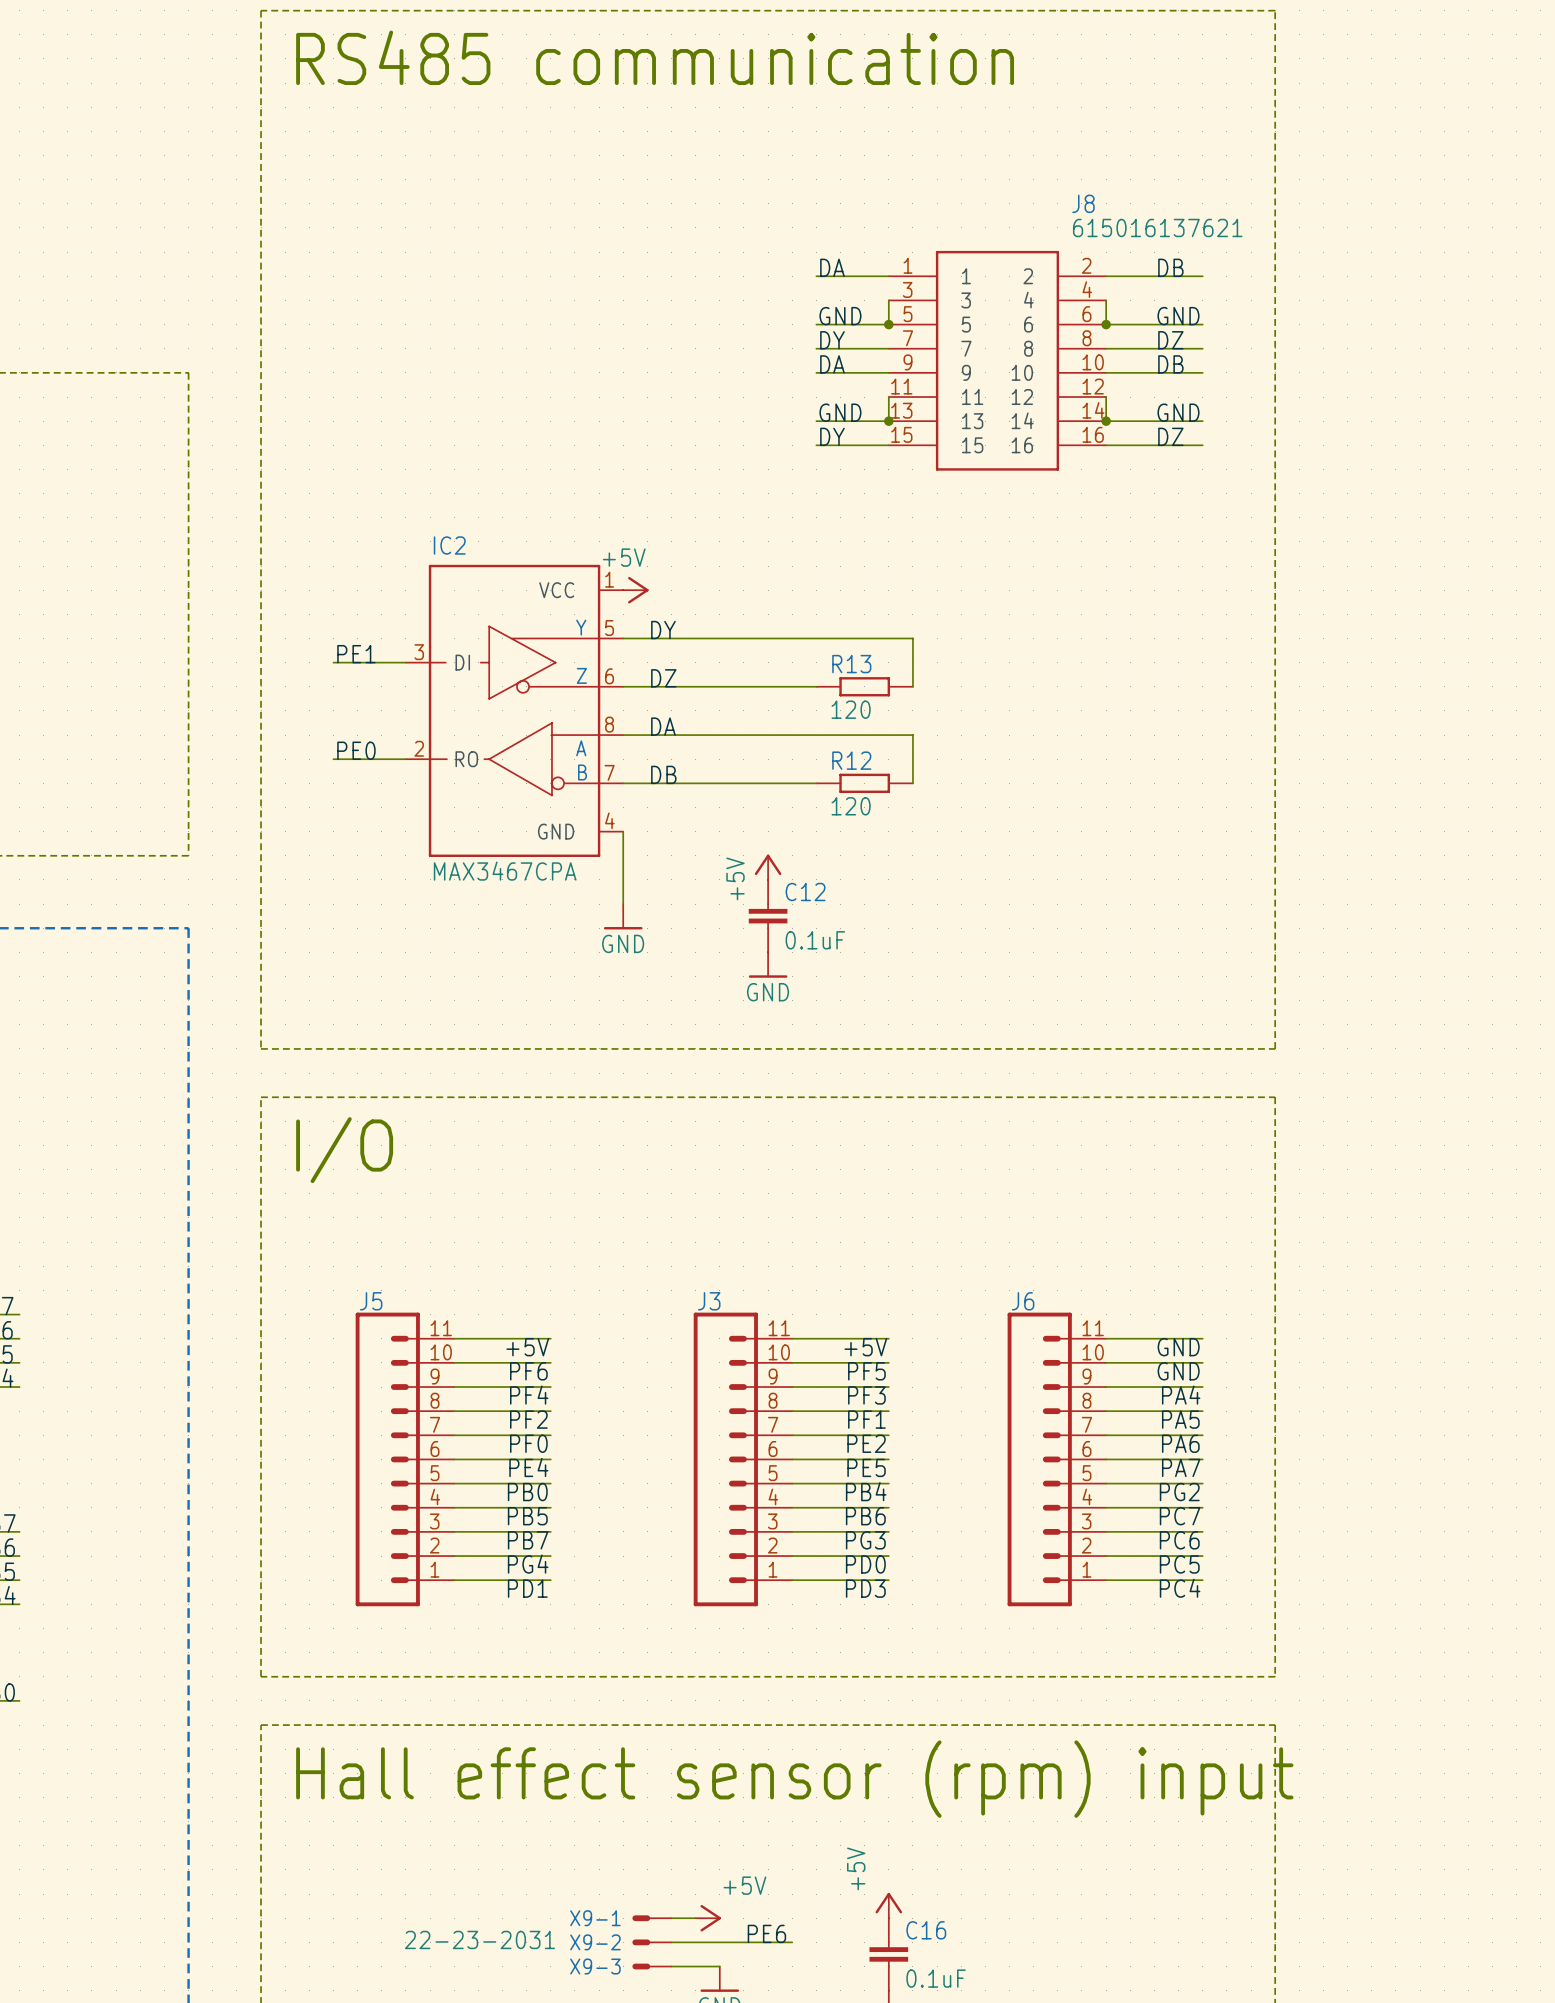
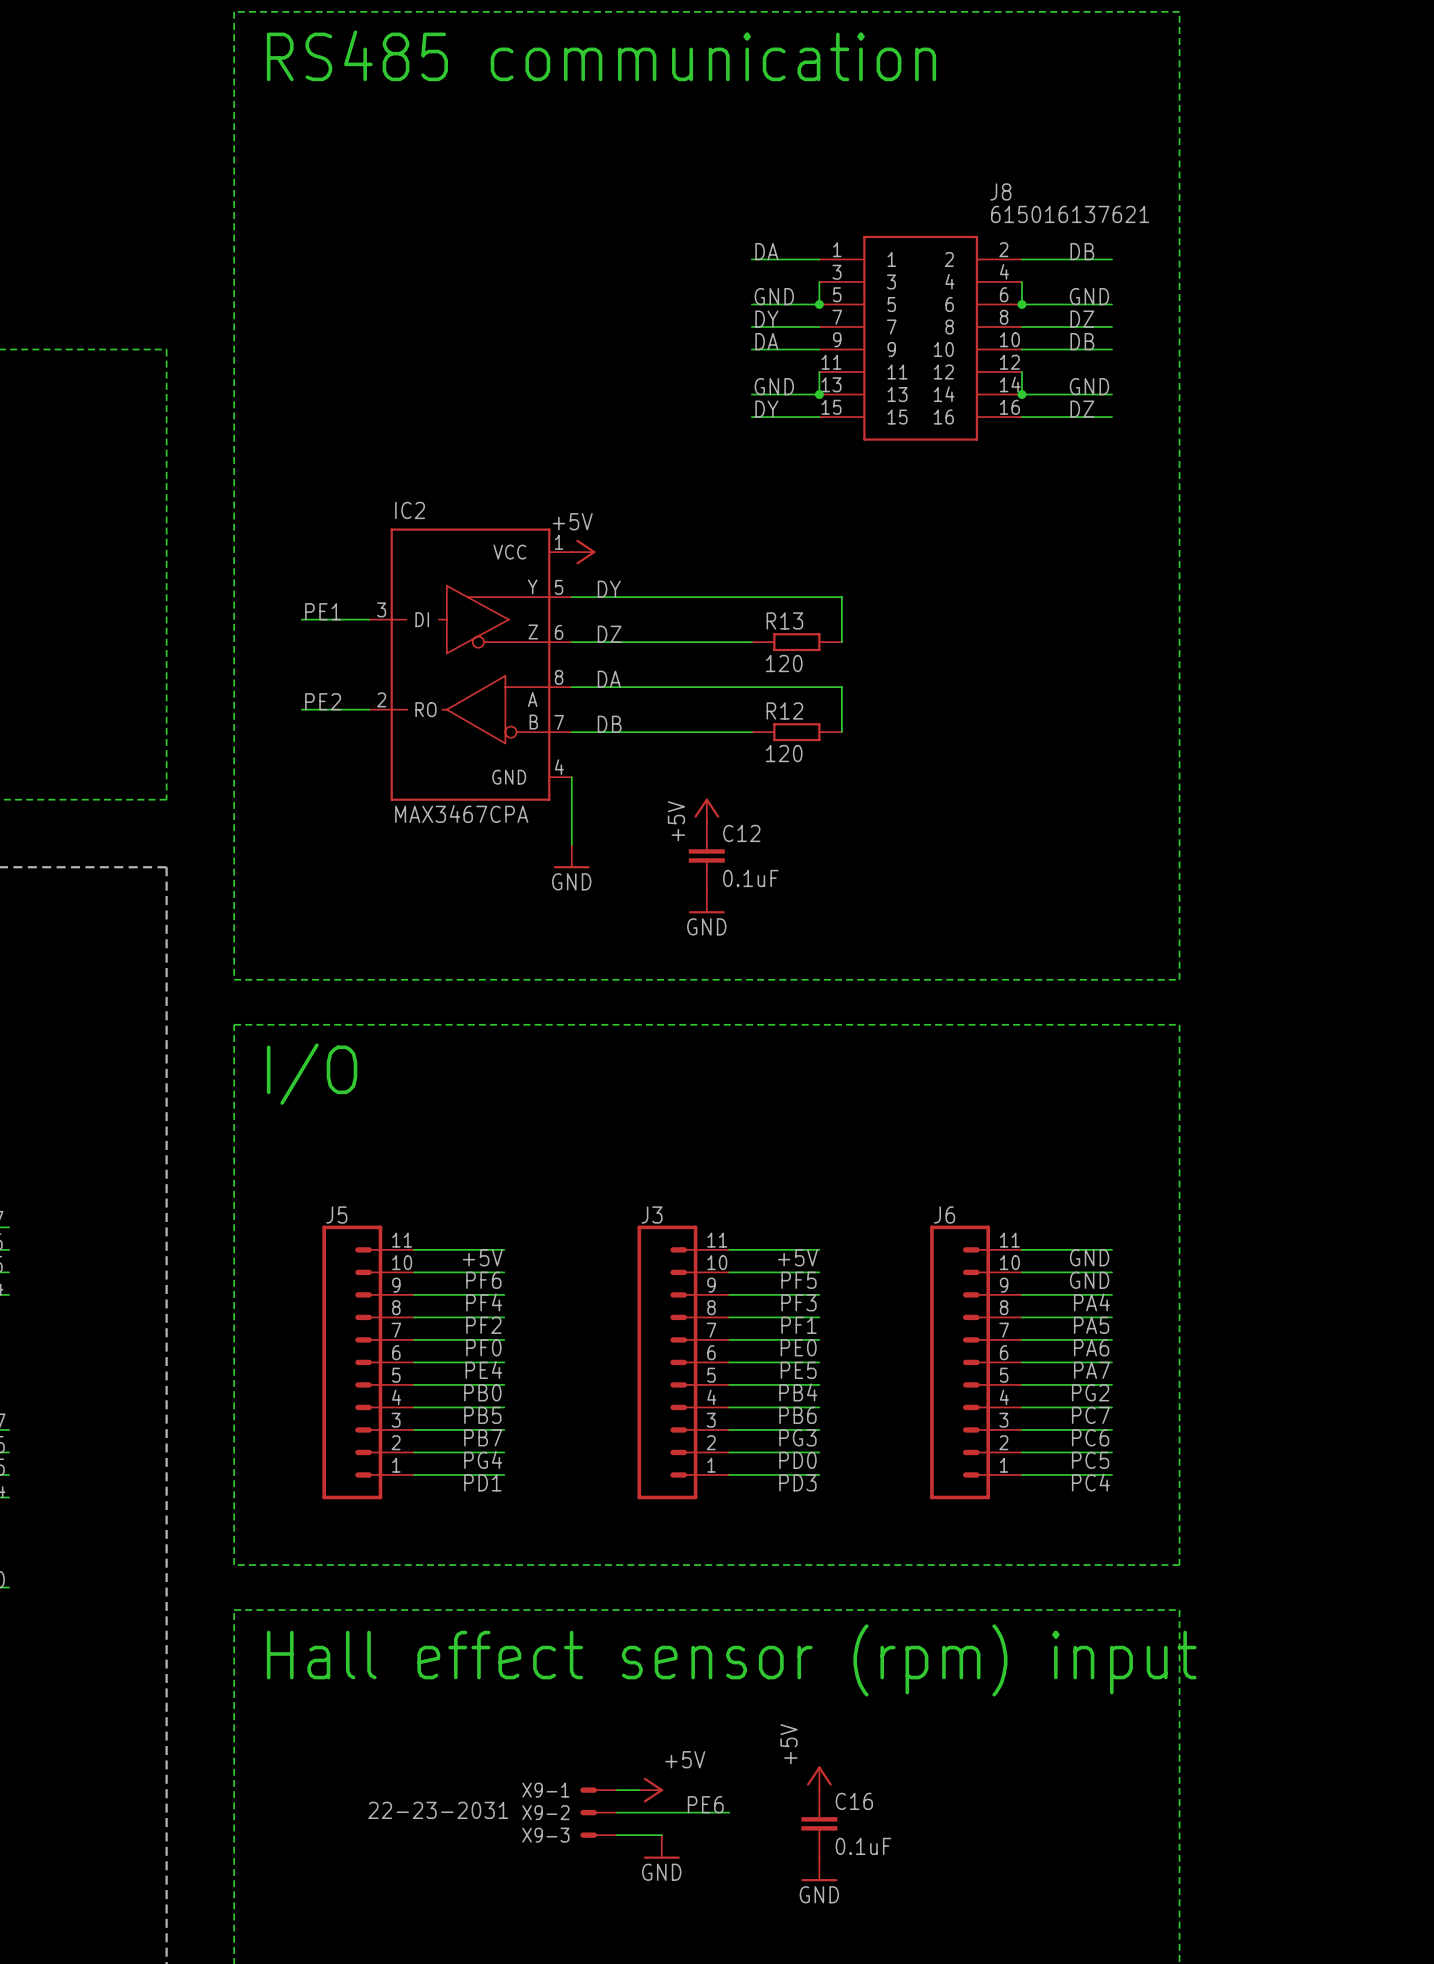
label: PE0 (356, 750) -> PE2 (323, 701)
label: PE2 (866, 1443) -> PE0 (798, 1347)

